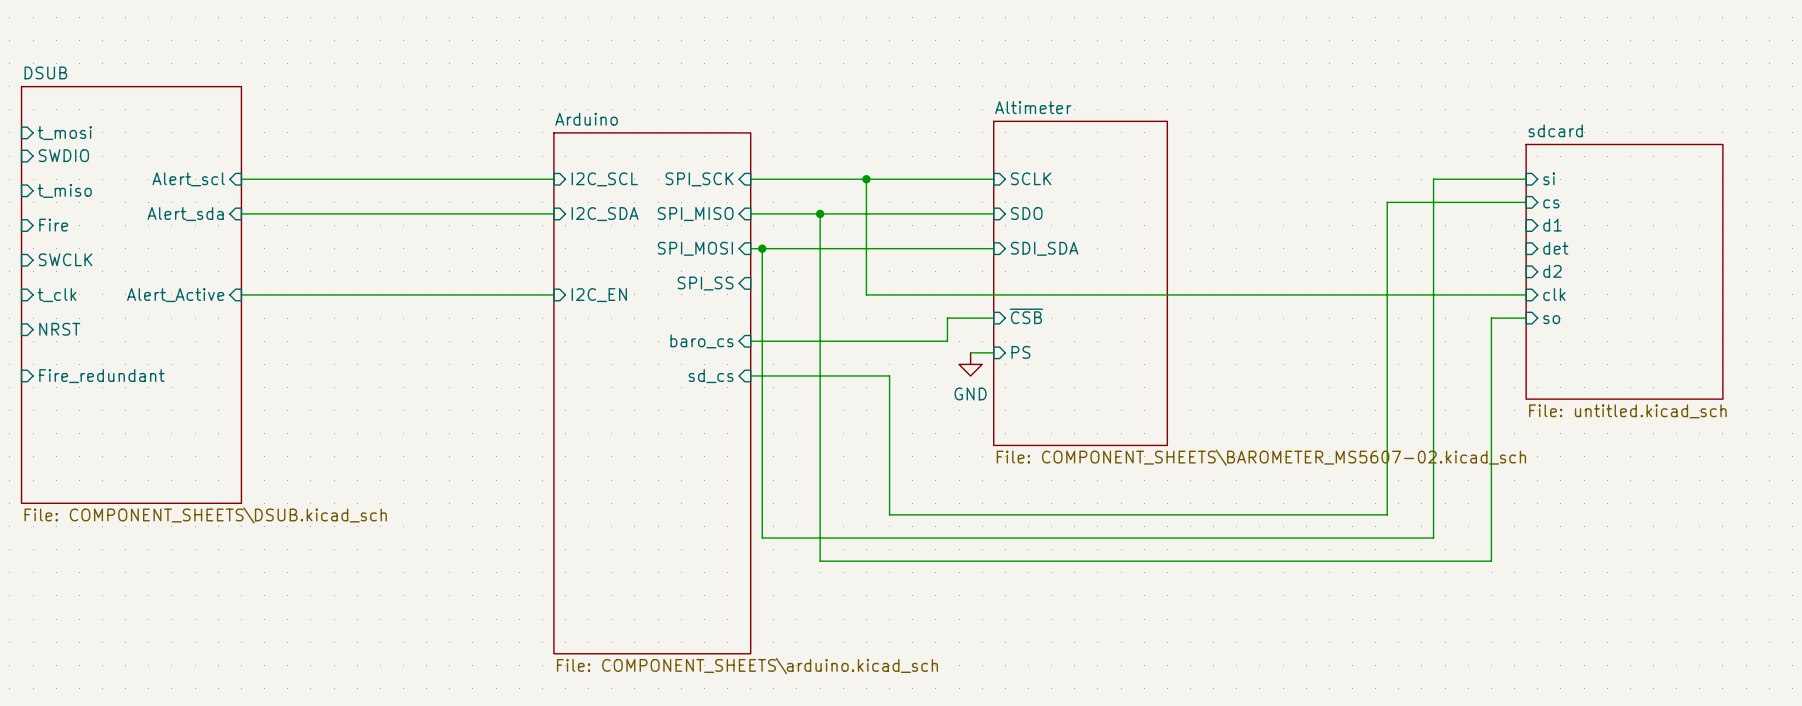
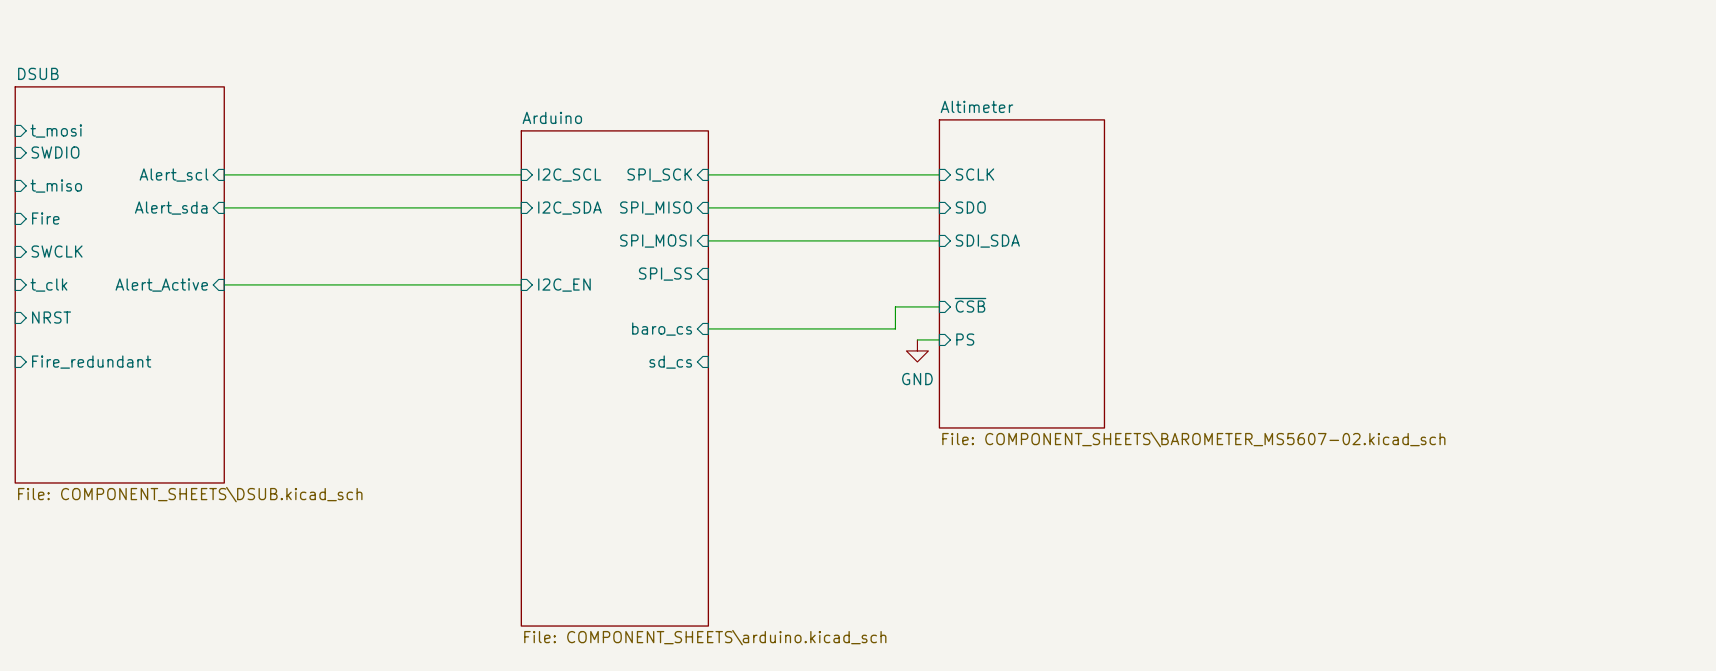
sheet pin: si (1549, 178) -> none
wire: (866, 179) (866, 294) (1526, 294) -> none
junction: (866, 179) -> none
wire: (1526, 179) (1433, 179) (1433, 538) (762, 538) (762, 248) -> none
wire: (1526, 202) (1387, 202) (1387, 514) (889, 514) (889, 375) (750, 375) -> none
sheet pin: cs (1551, 203) -> none
wire: (820, 213) (820, 561) (1491, 561) (1491, 318) (1526, 318) -> none
junction: (820, 213) -> none
sheet pin: d1 (1552, 225) -> none
junction: (762, 248) -> none
sheet pin: det (1555, 248) -> none
sheet pin: d2 (1552, 271) -> none
sheet sdcard: File: untitled.kicad_sch (1624, 271) -> none
sheet pin: clk (1554, 294) -> none
sheet pin: so (1551, 319) -> none

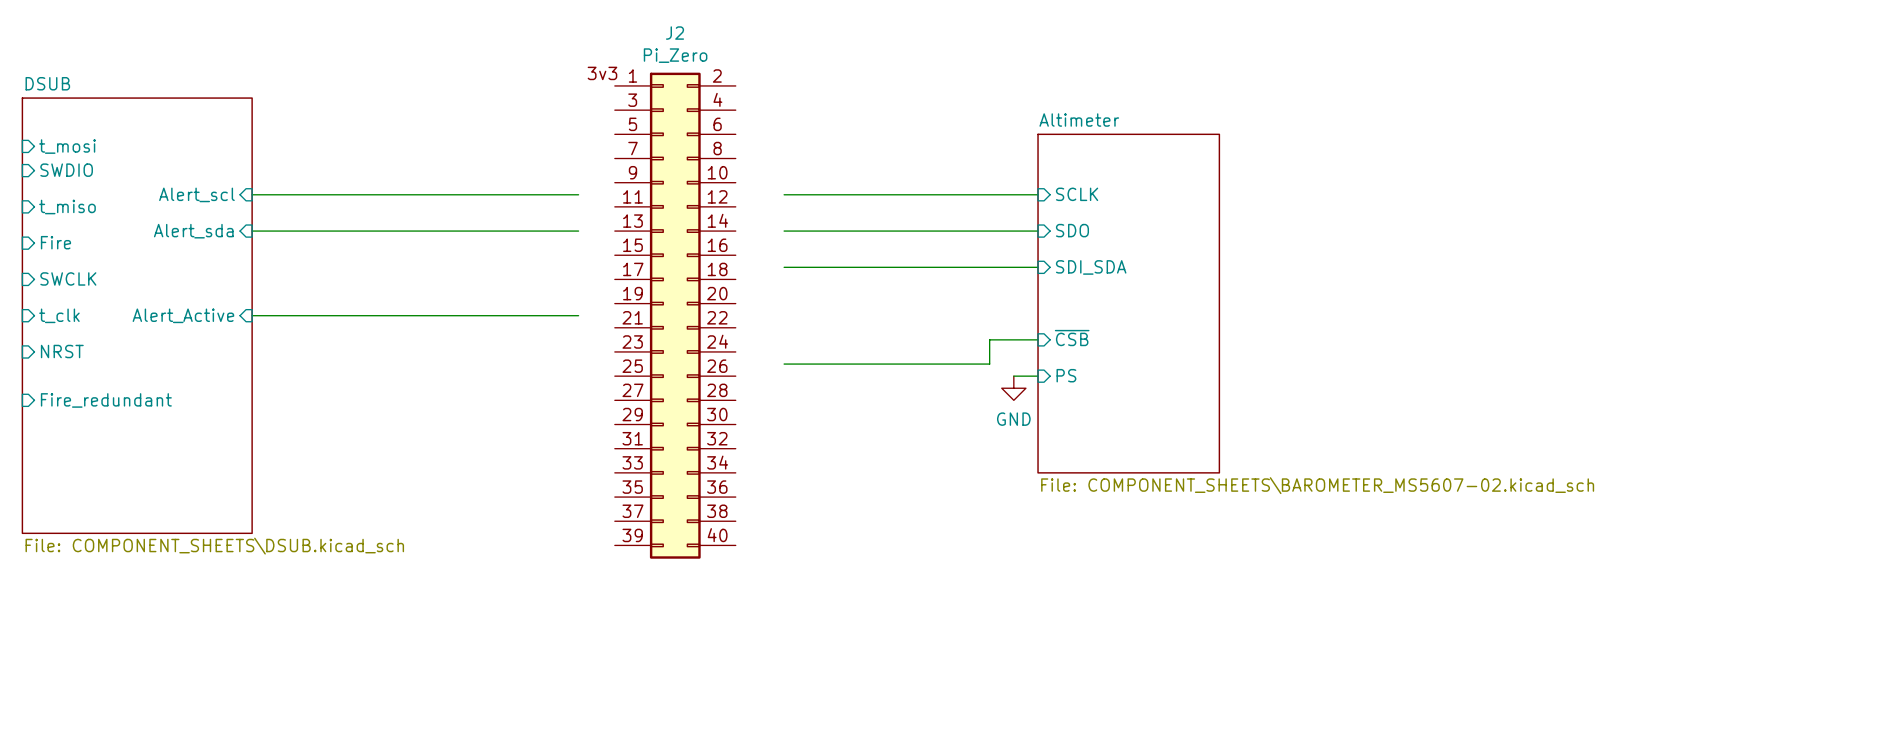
sheet pin: I2C_SCL (569, 175) -> none
sheet pin: SPI_SCK (659, 175) -> none
sheet pin: I2C_SDA (569, 208) -> none
sheet pin: SPI_MISO (656, 208) -> none
sheet pin: SPI_MOSI (655, 241) -> none
sheet pin: SPI_SS (665, 274) -> none
J2: none -> Pi_Zero (675, 315)
sheet pin: I2C_EN (564, 285) -> none
sheet pin: baro_cs (662, 329) -> none
sheet pin: sd_cs (670, 362) -> none
sheet Arduino: File: COMPONENT_SHEETS\arduino.kicad_sch (614, 378) -> none

